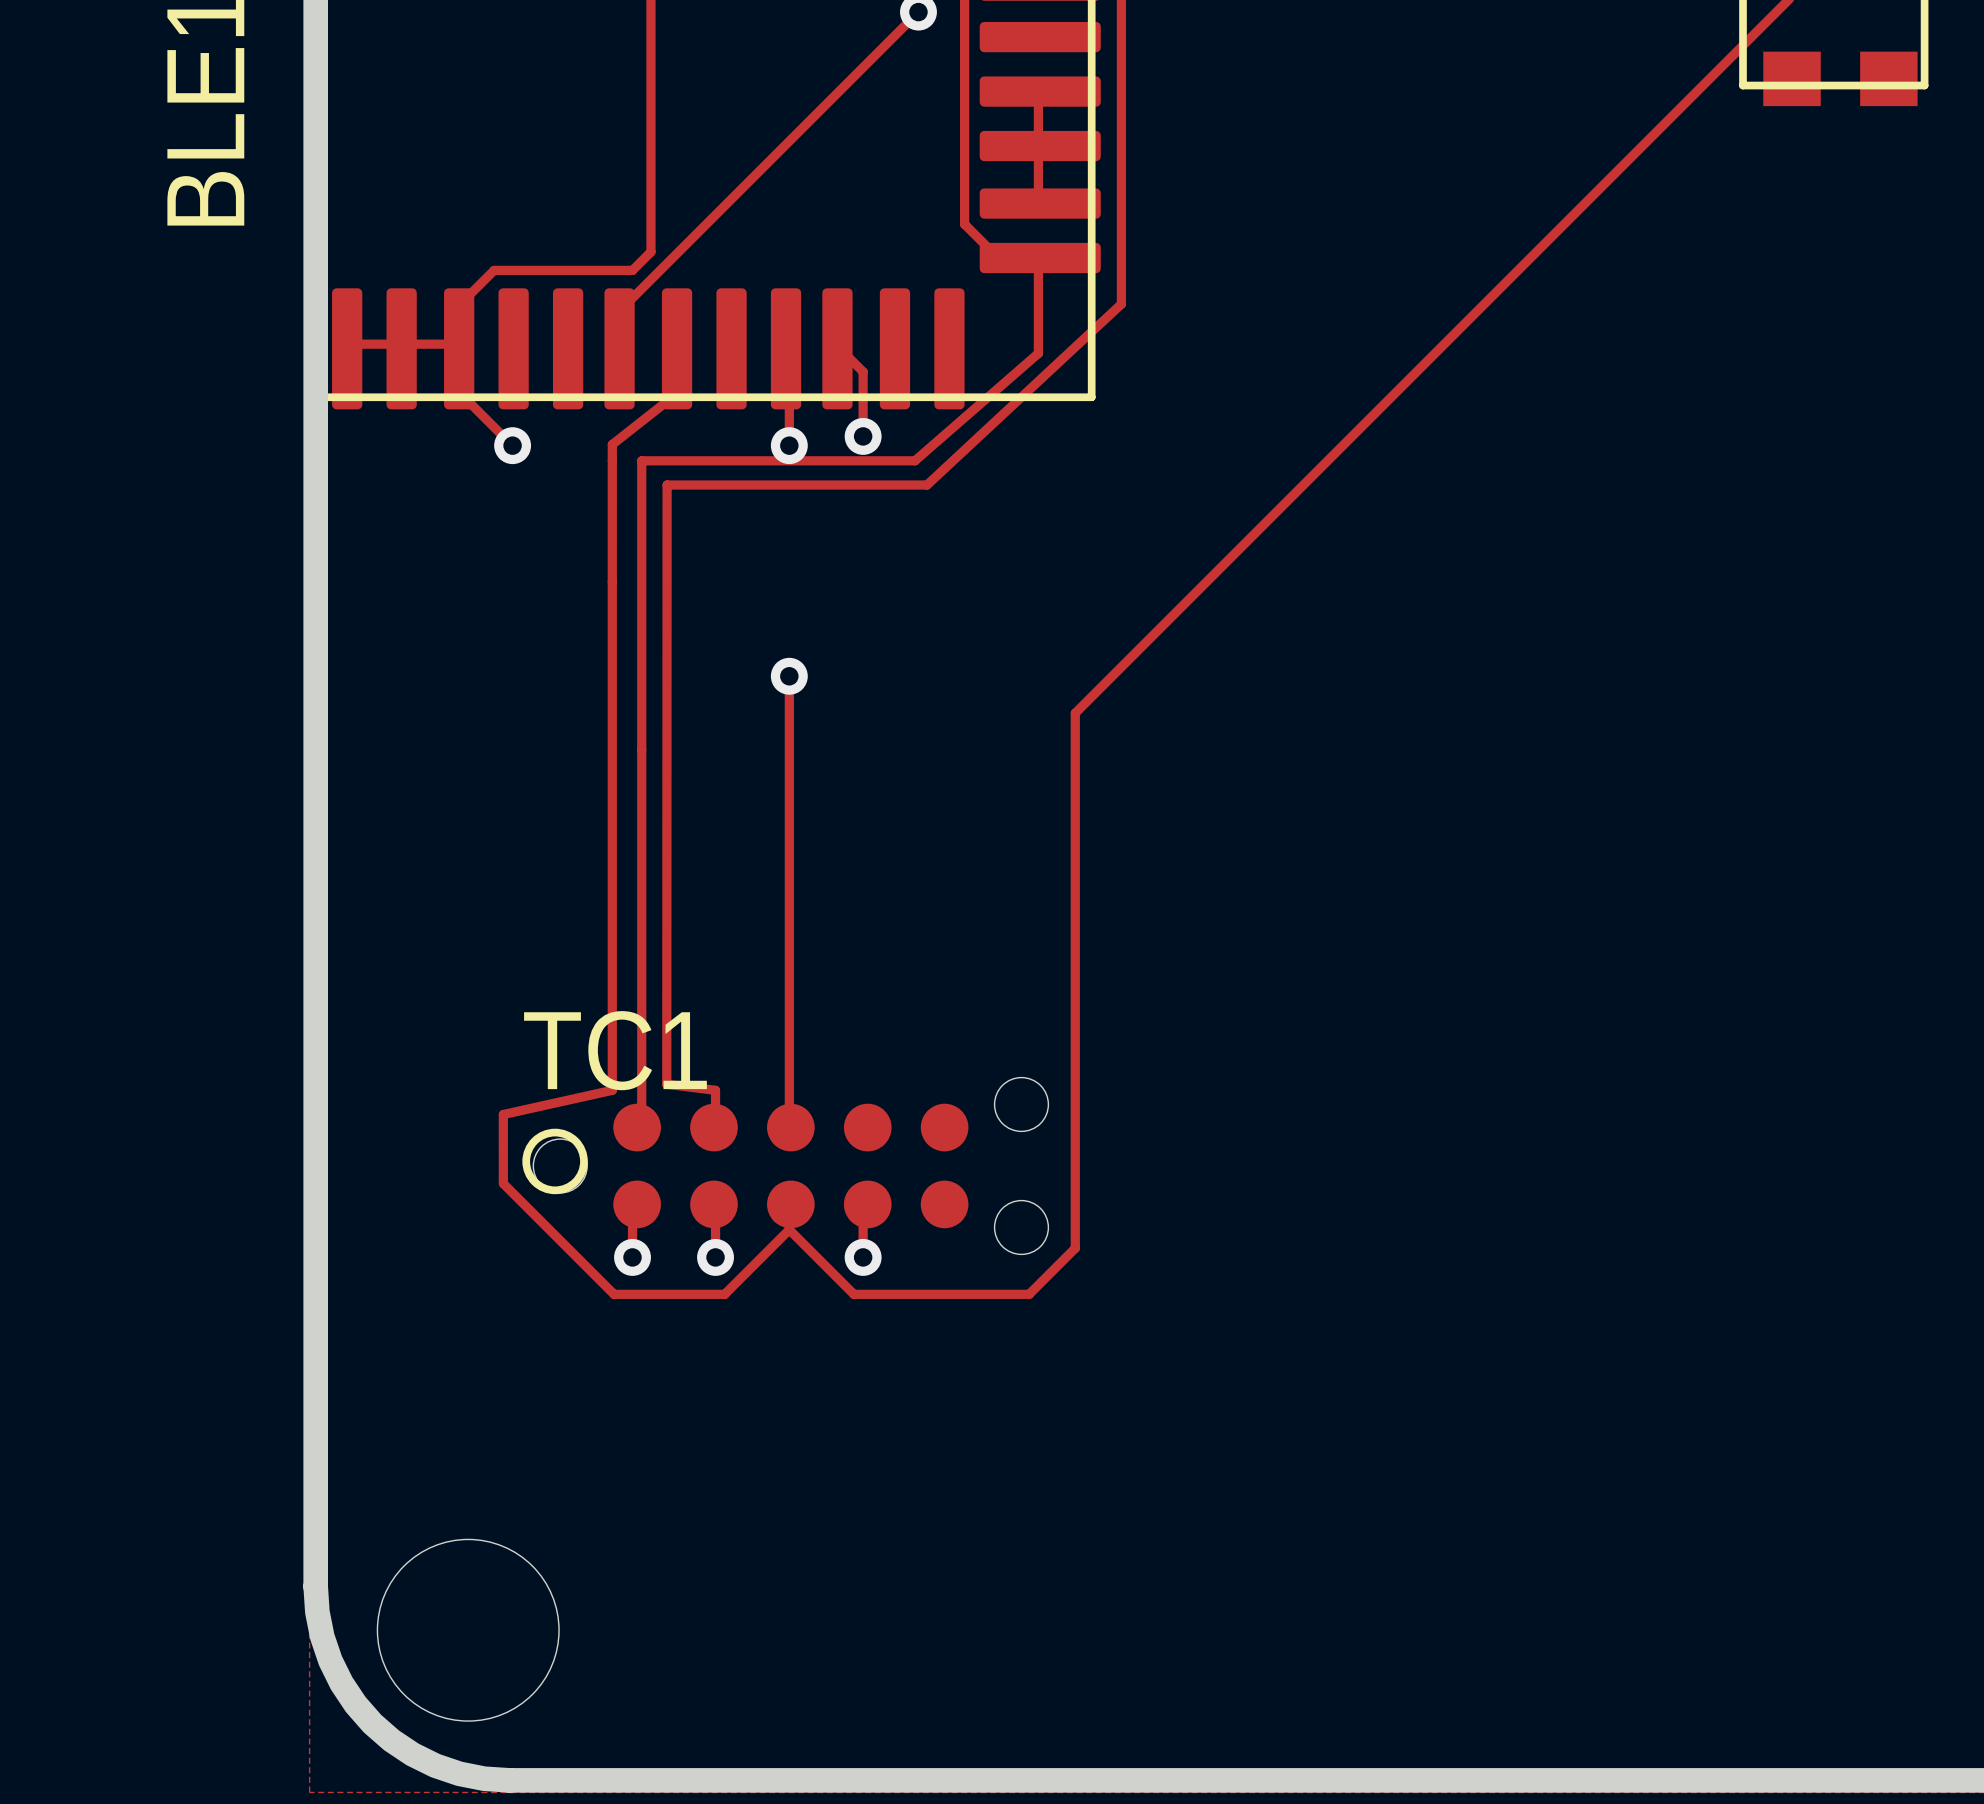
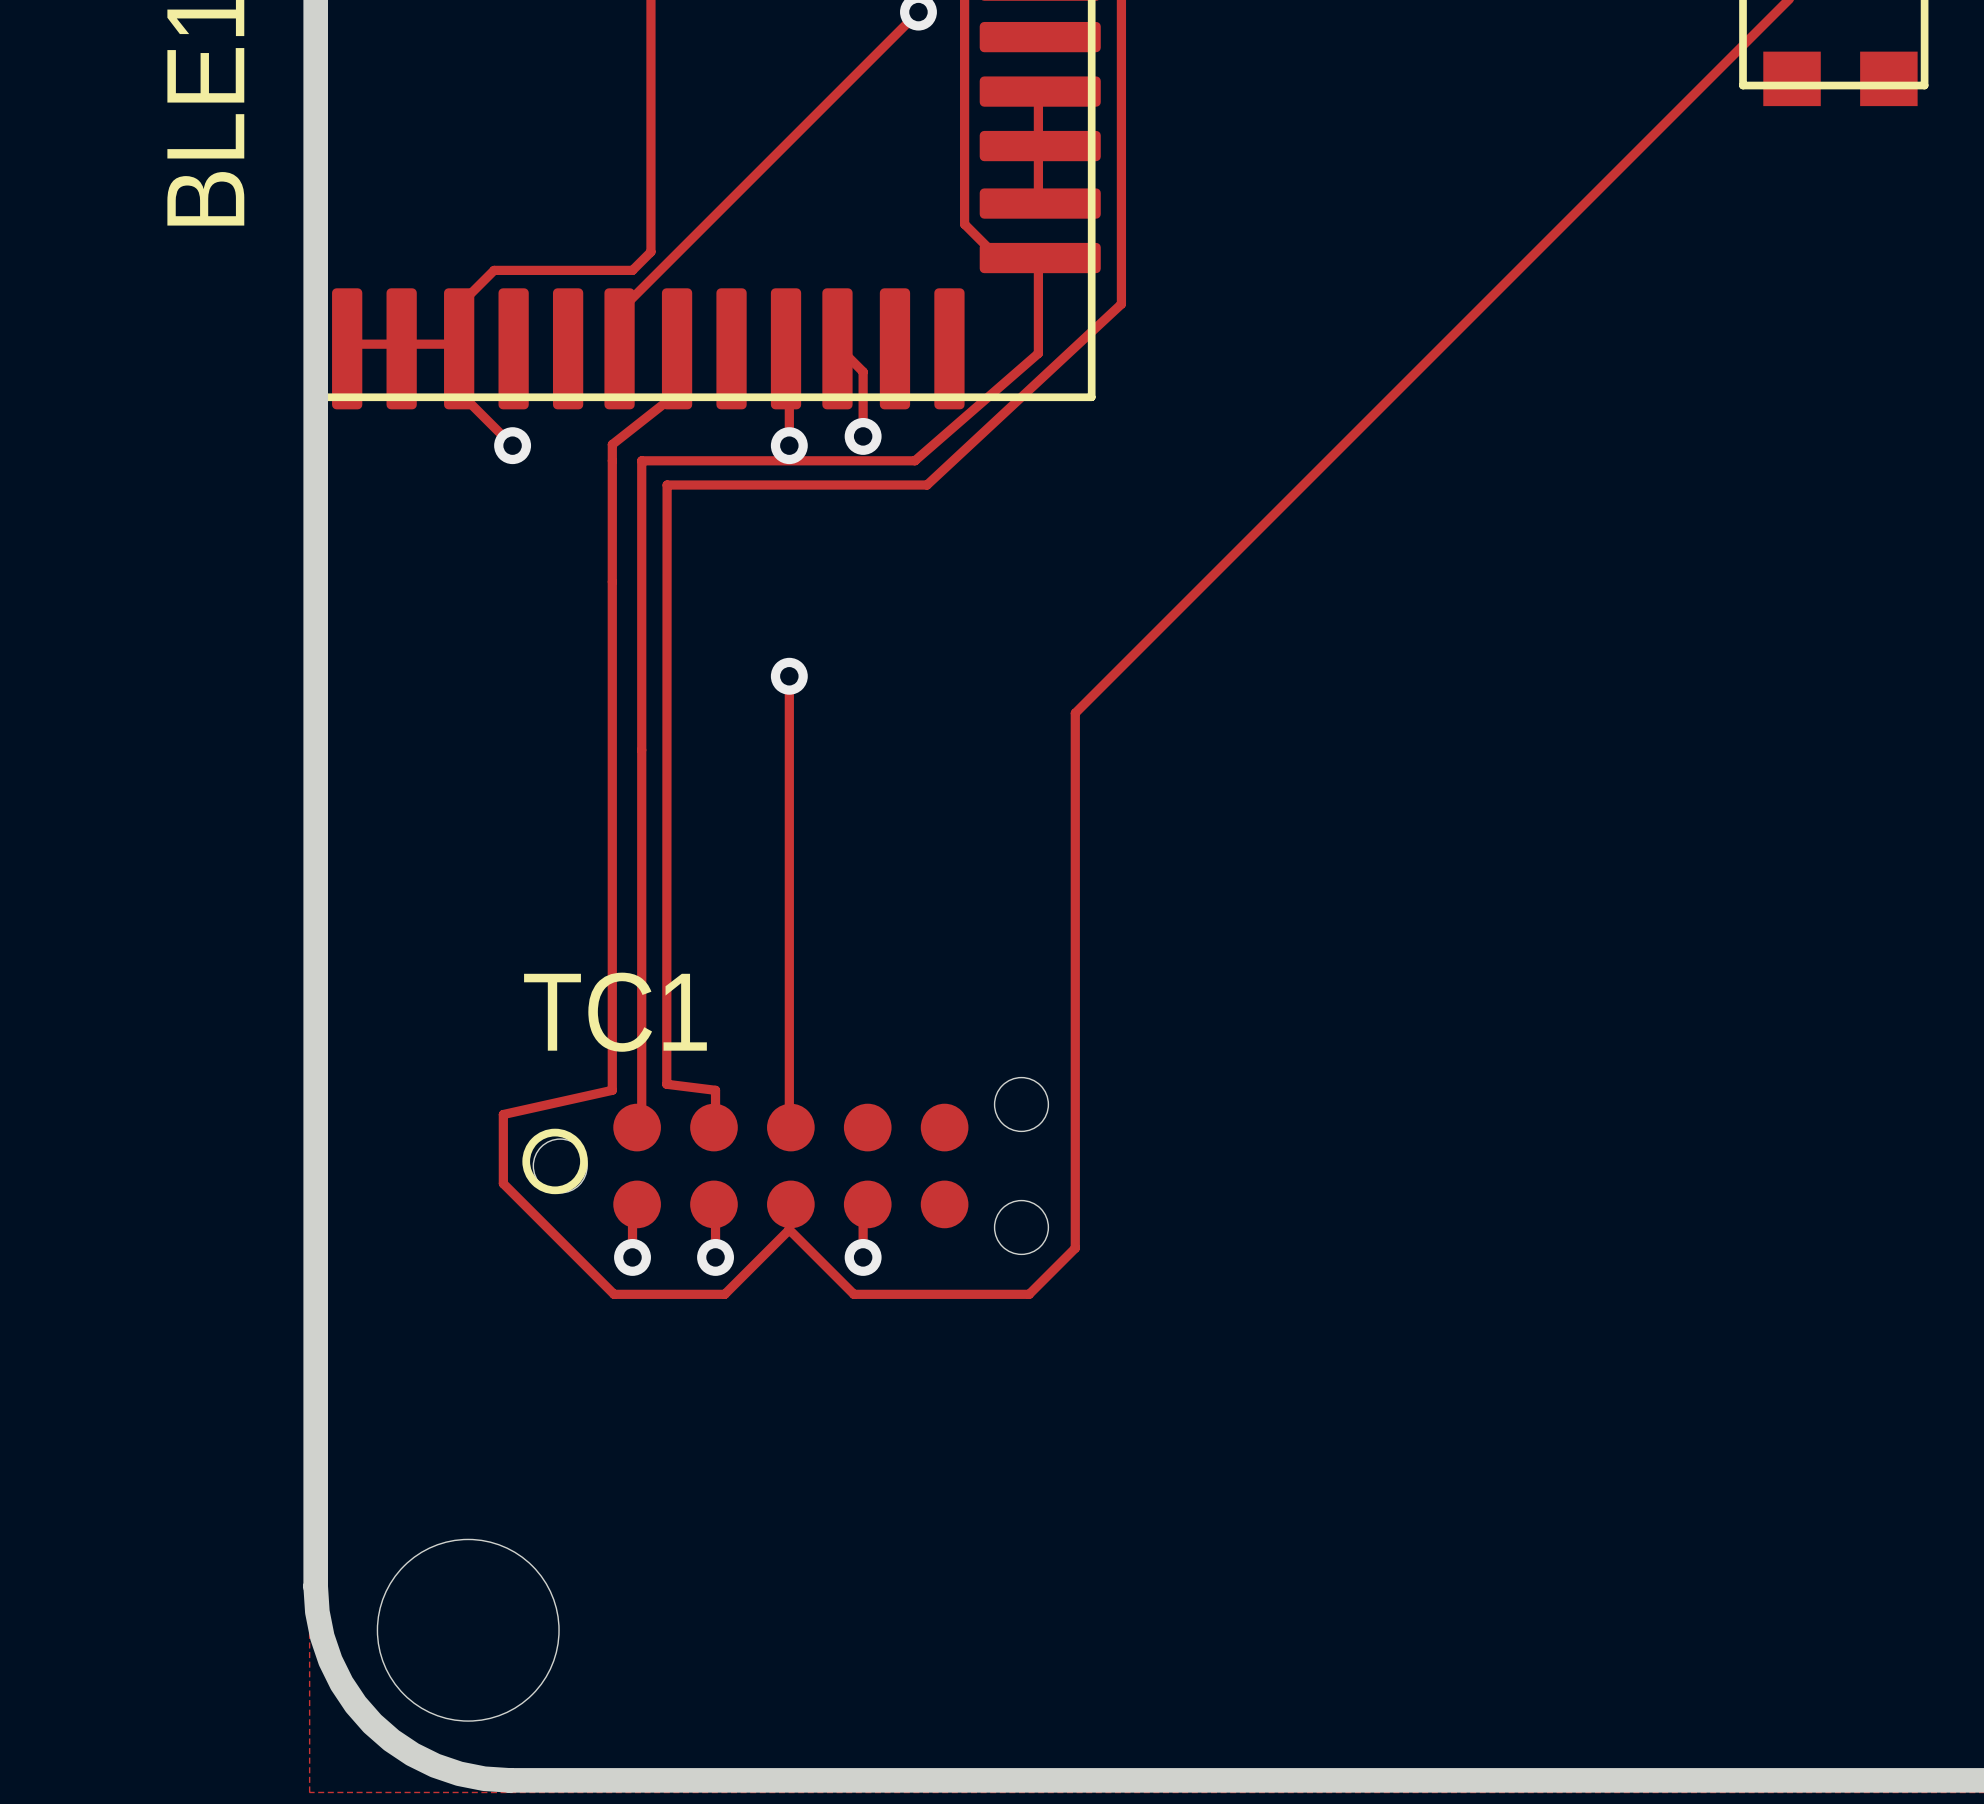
TC1 name position: TC1 (615, 1050) -> TC1 (615, 1012)

